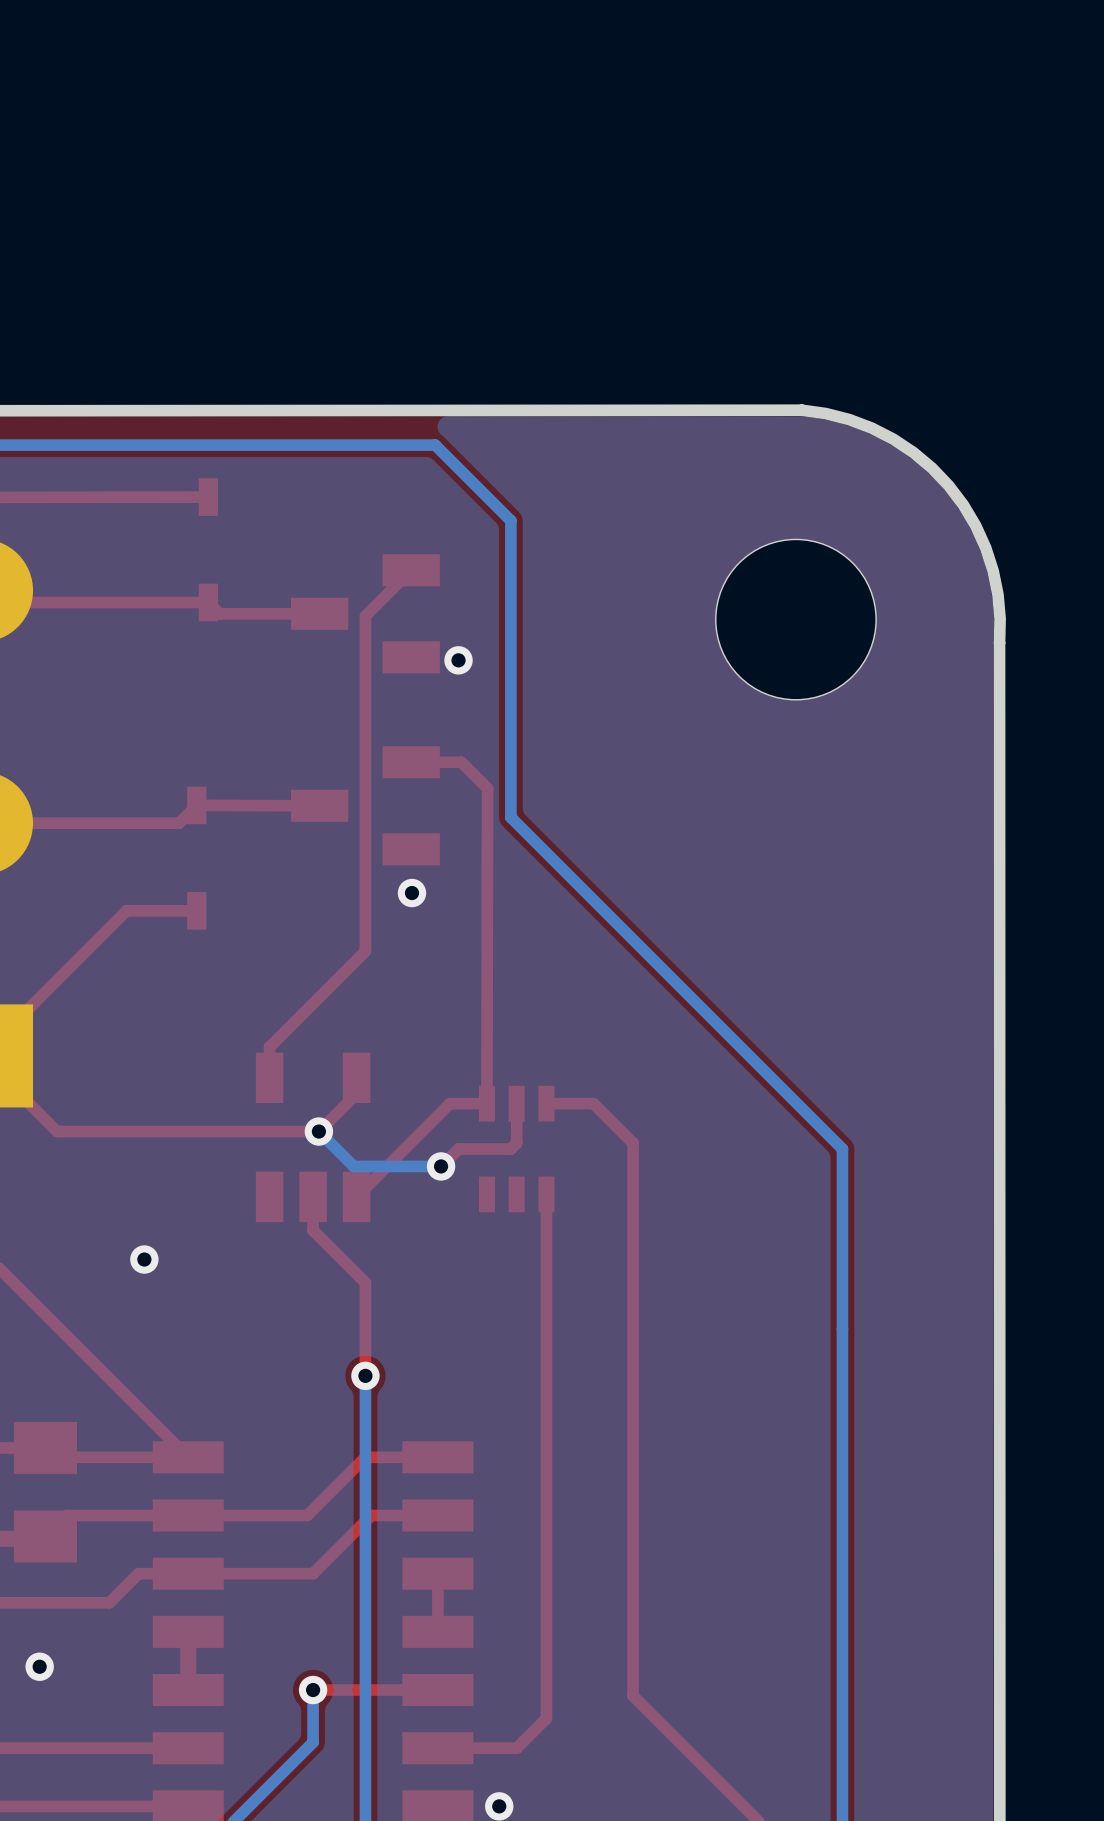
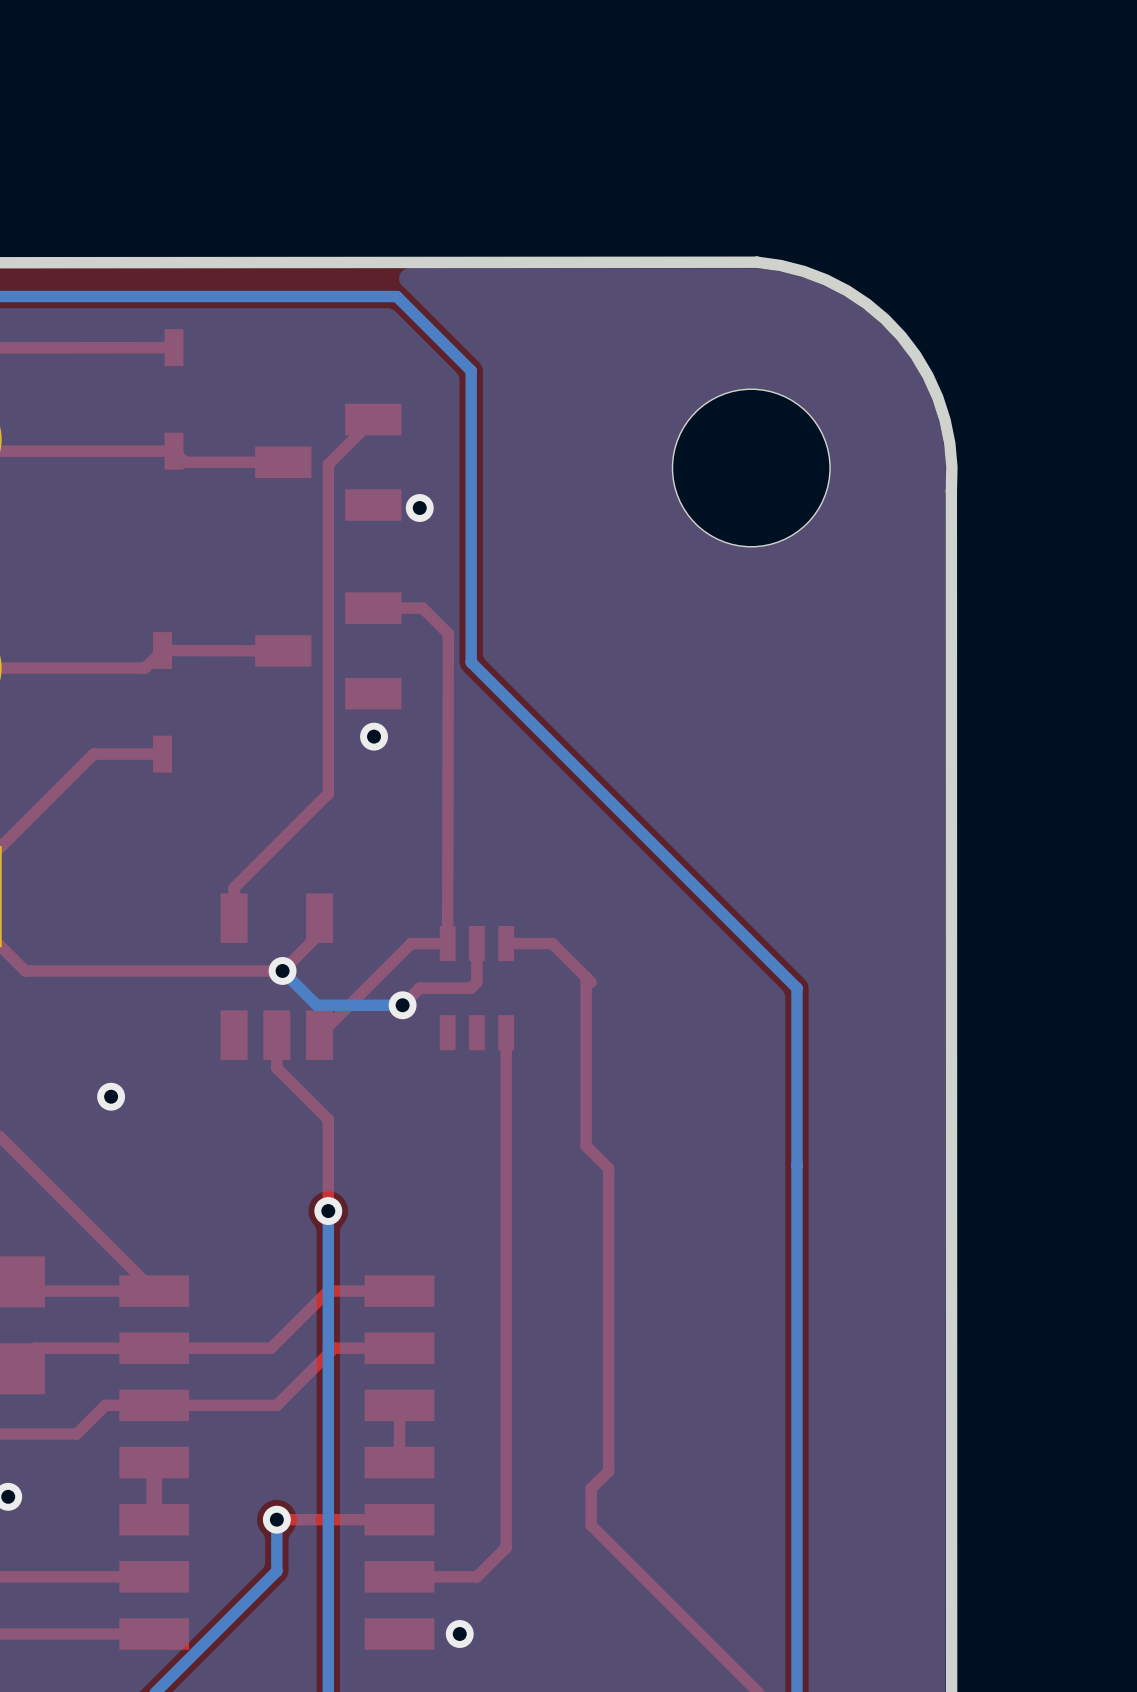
top track: (633, 1143) (633, 1658) -> (586, 977) (586, 1145) (608, 1168) (608, 1471) (591, 1488)

